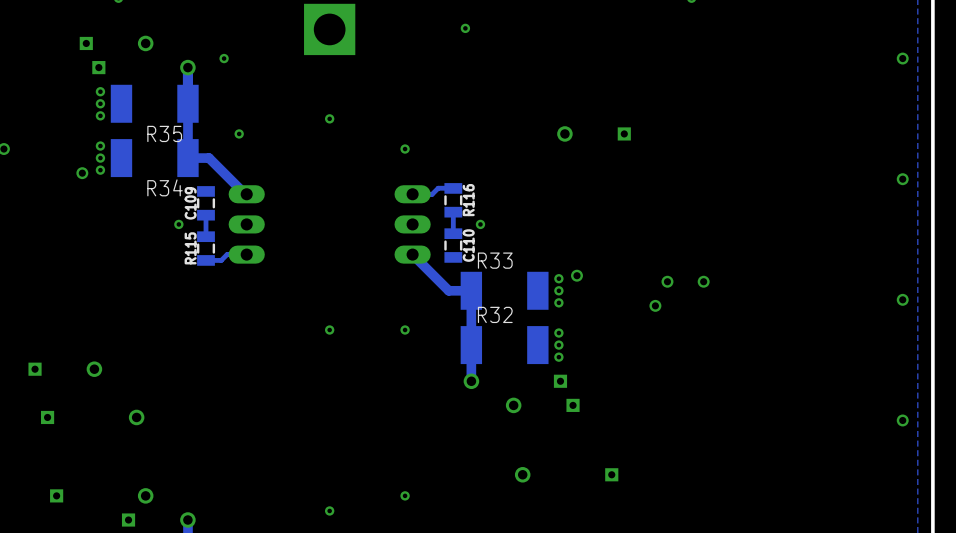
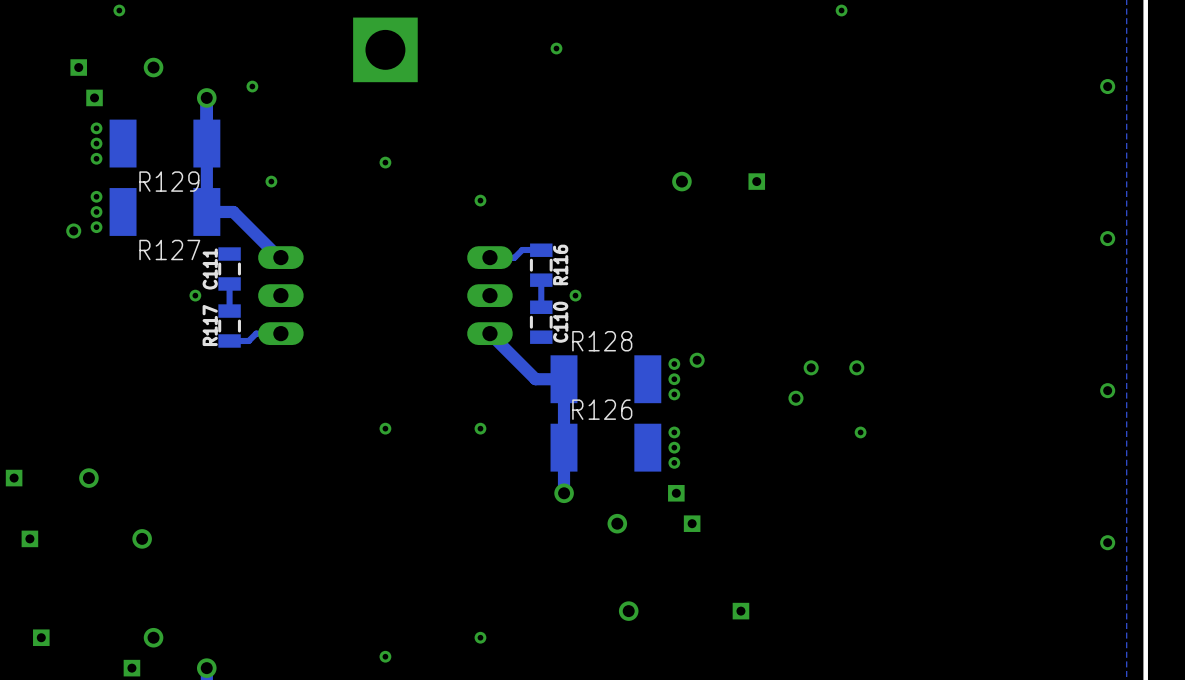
R35 name: R35 (164, 133) -> R129 (169, 181)
R34 name: R34 (165, 187) -> R127 (169, 249)
C109 name: C109 (190, 203) -> C111 (210, 269)
R115 name: R115 (190, 248) -> R117 (210, 325)
R33 name: R33 (495, 260) -> R128 (602, 341)
R32 name: R32 (495, 314) -> R126 (602, 409)
via: none -> (860, 432)

